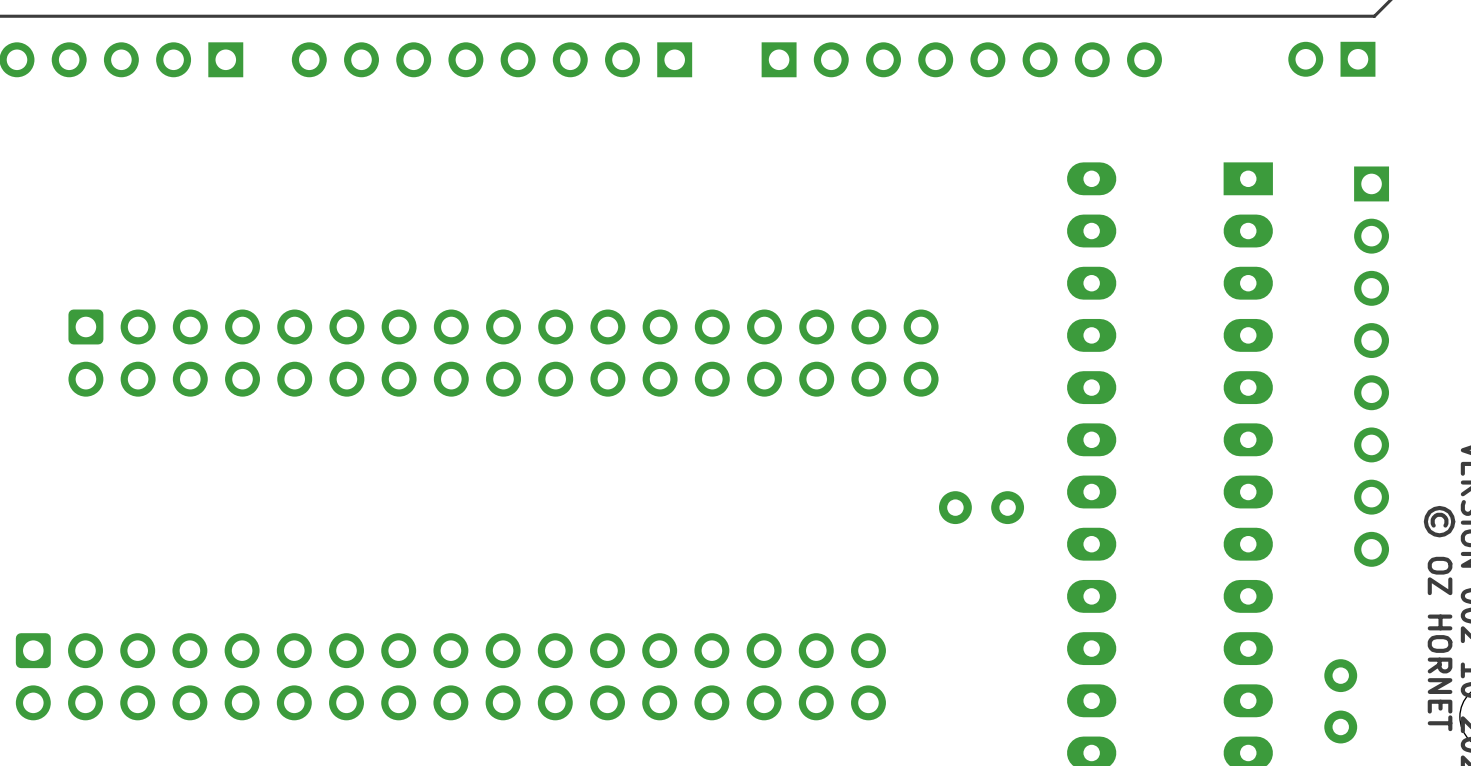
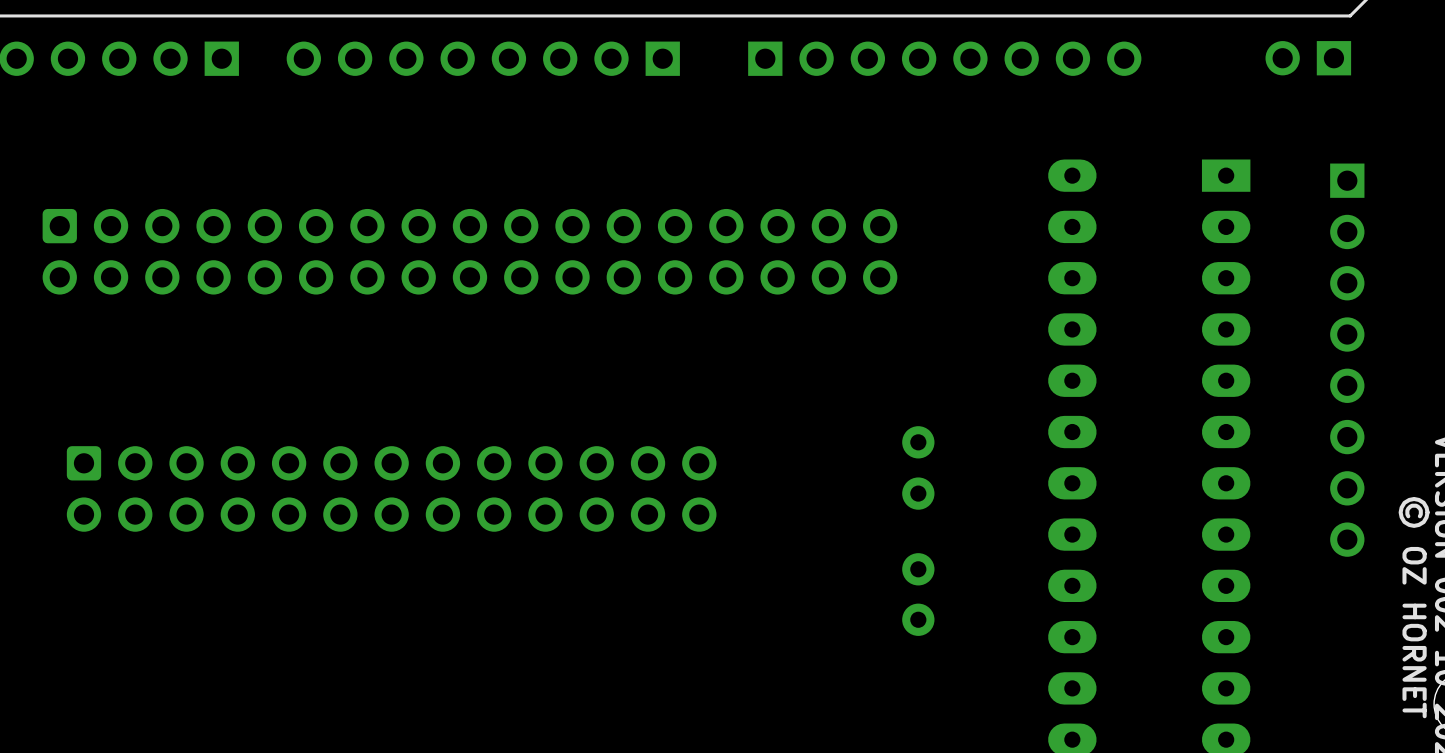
part position: (503, 353) -> (469, 251)
part: none -> (391, 488)
part rotation: 0° (981, 507) -> 90° clockwise (918, 467)
part position: (981, 507) -> (918, 467)
part: (450, 676) -> none
part position: (1340, 701) -> (918, 594)

